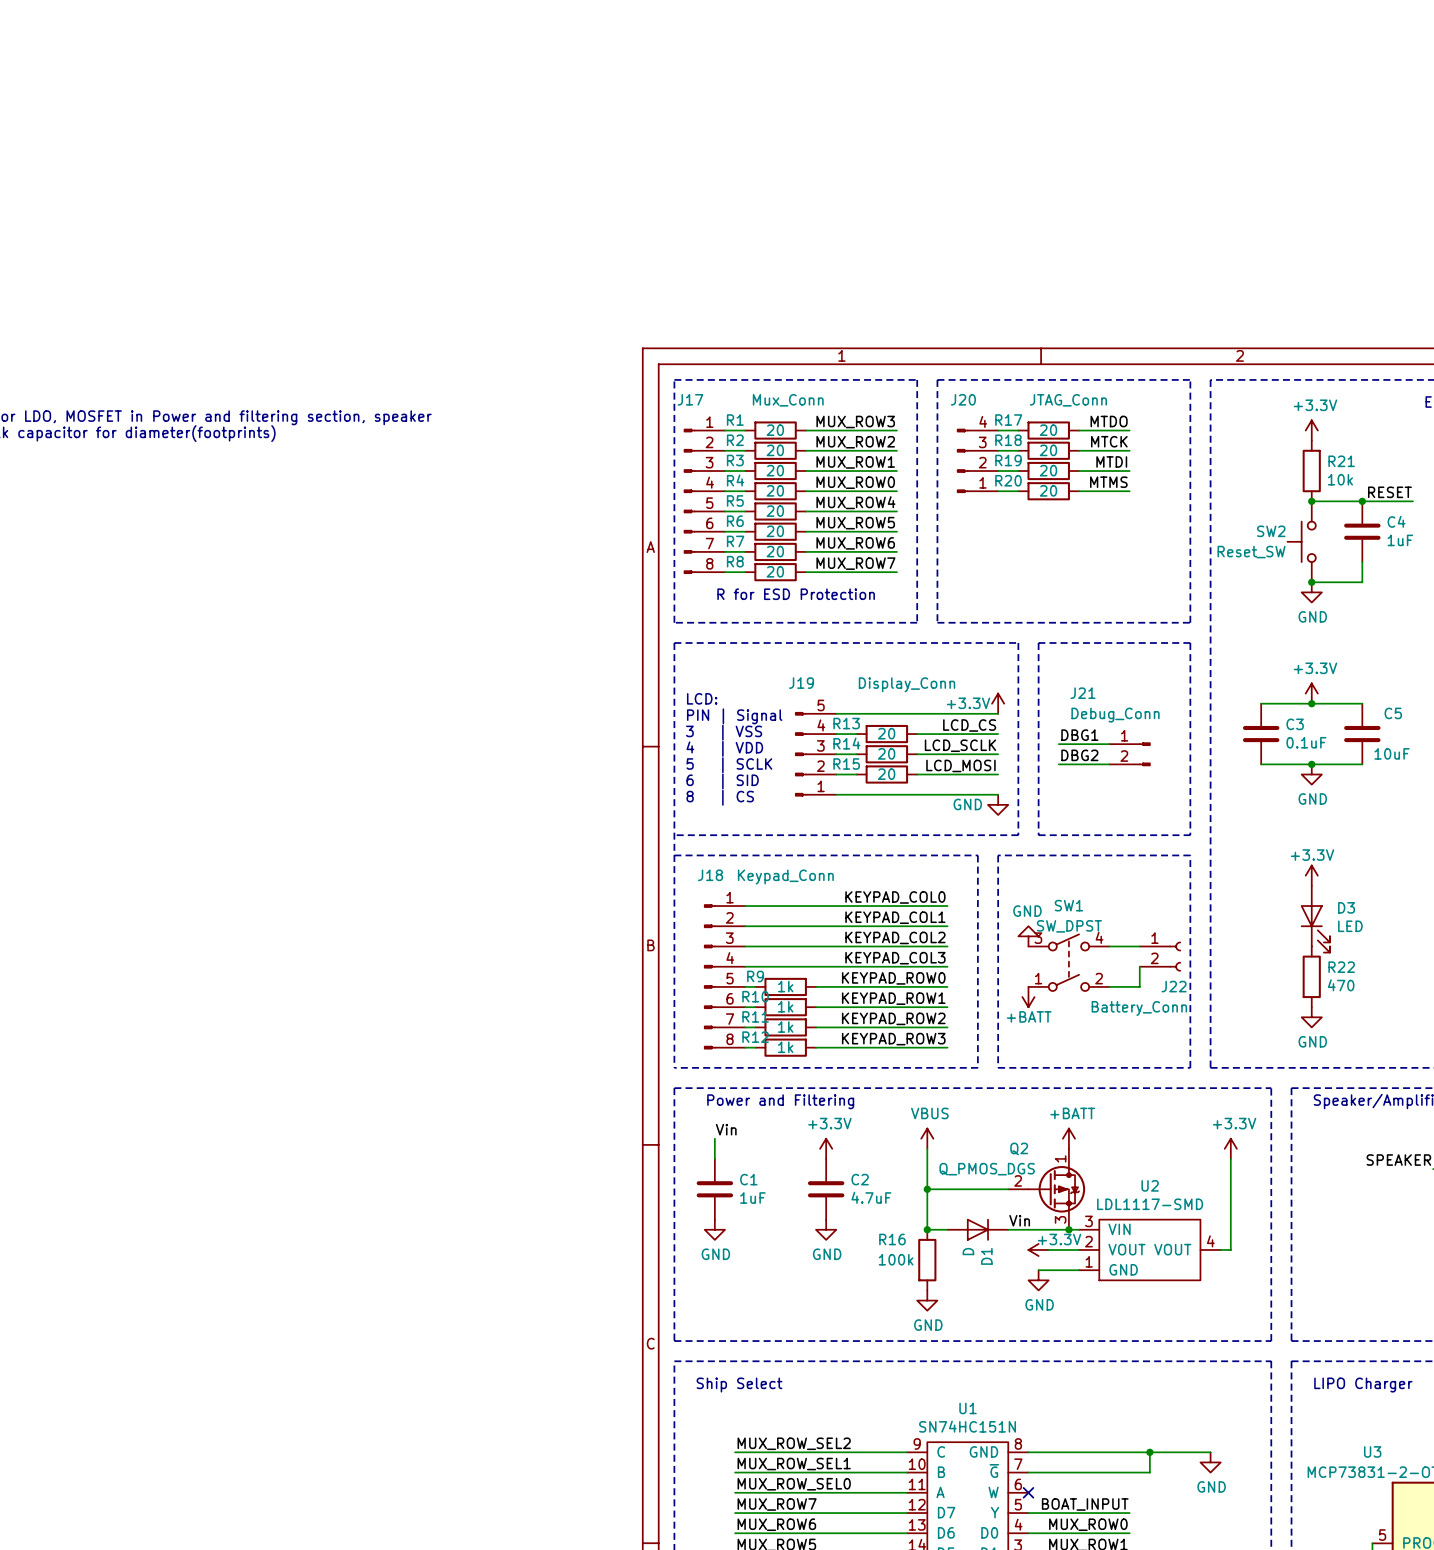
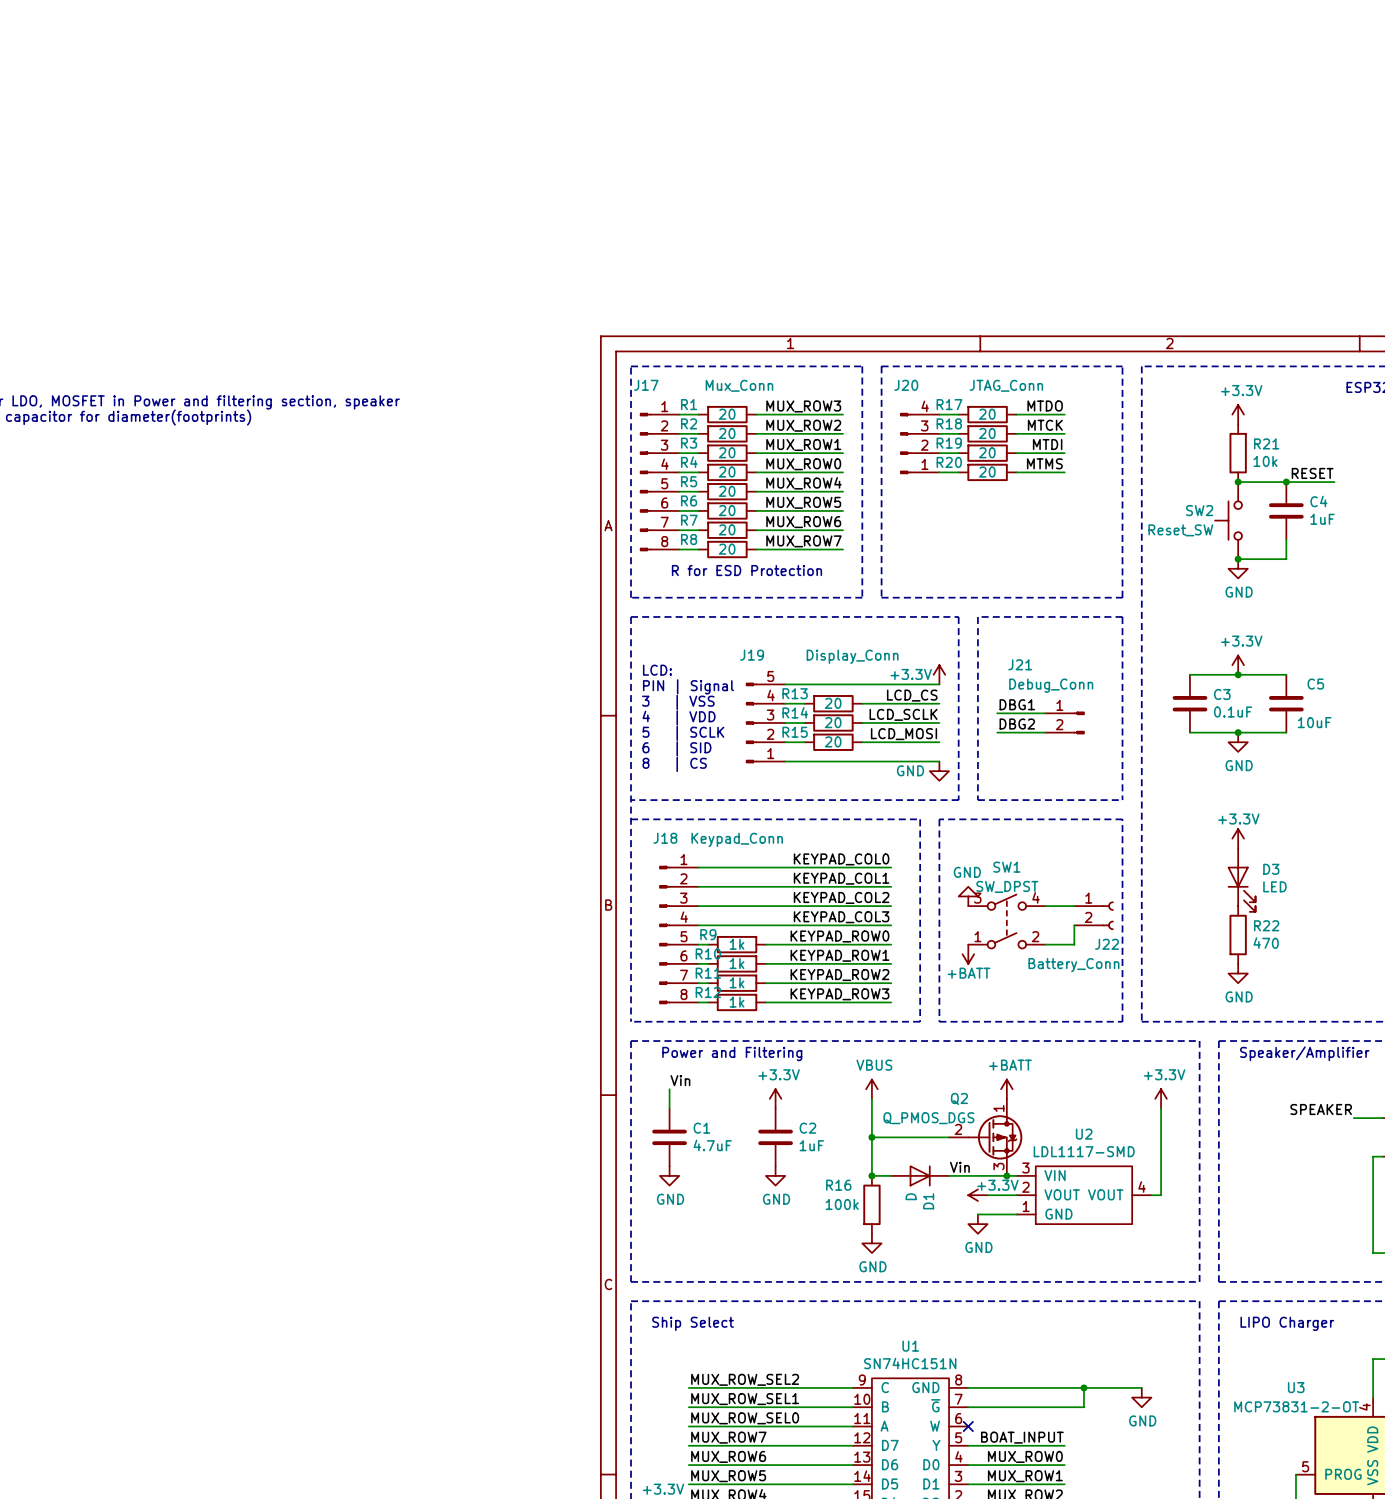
C2 value: 4.7uF (871, 1197) -> 1uF (811, 1145)
C1 value: 1uF (752, 1198) -> 4.7uF (712, 1145)

